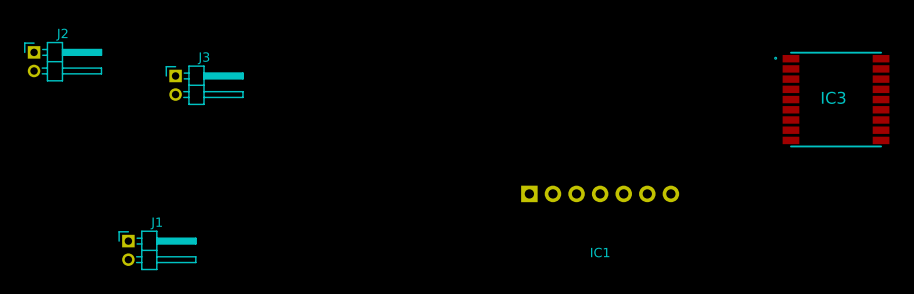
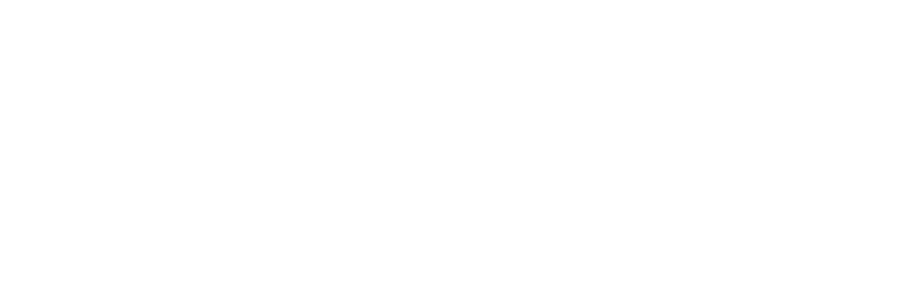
J2: (63, 61) -> none
J3: (204, 85) -> none
IC3: (831, 99) -> none
IC1: (600, 193) -> none
J1: (157, 250) -> none

